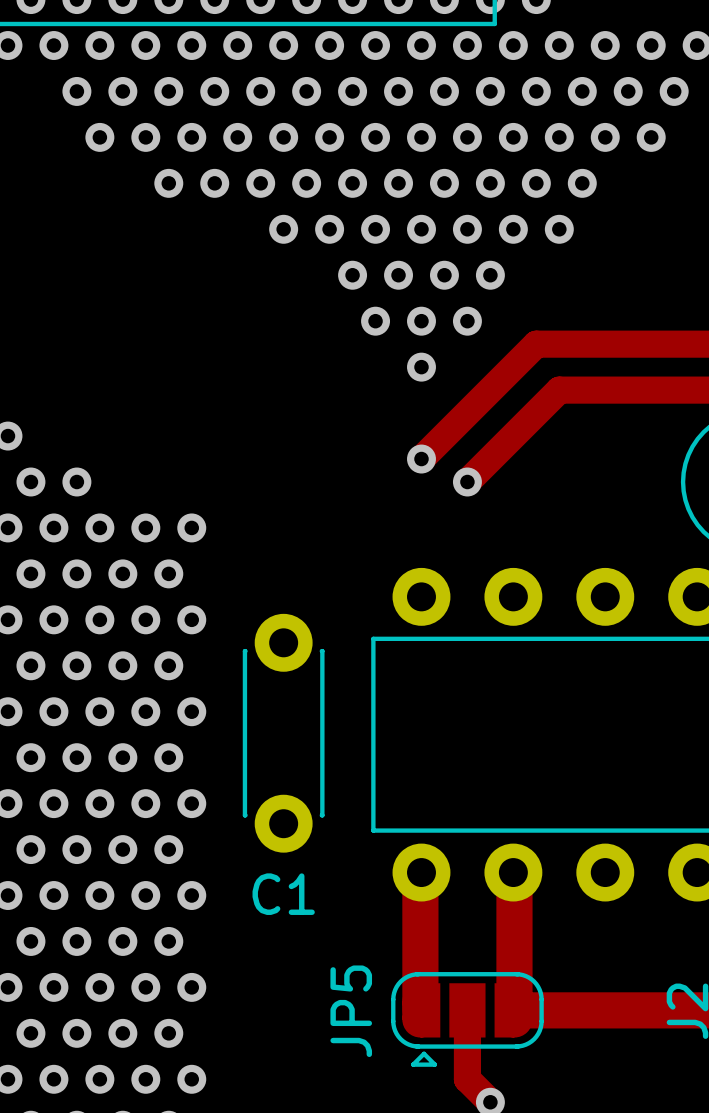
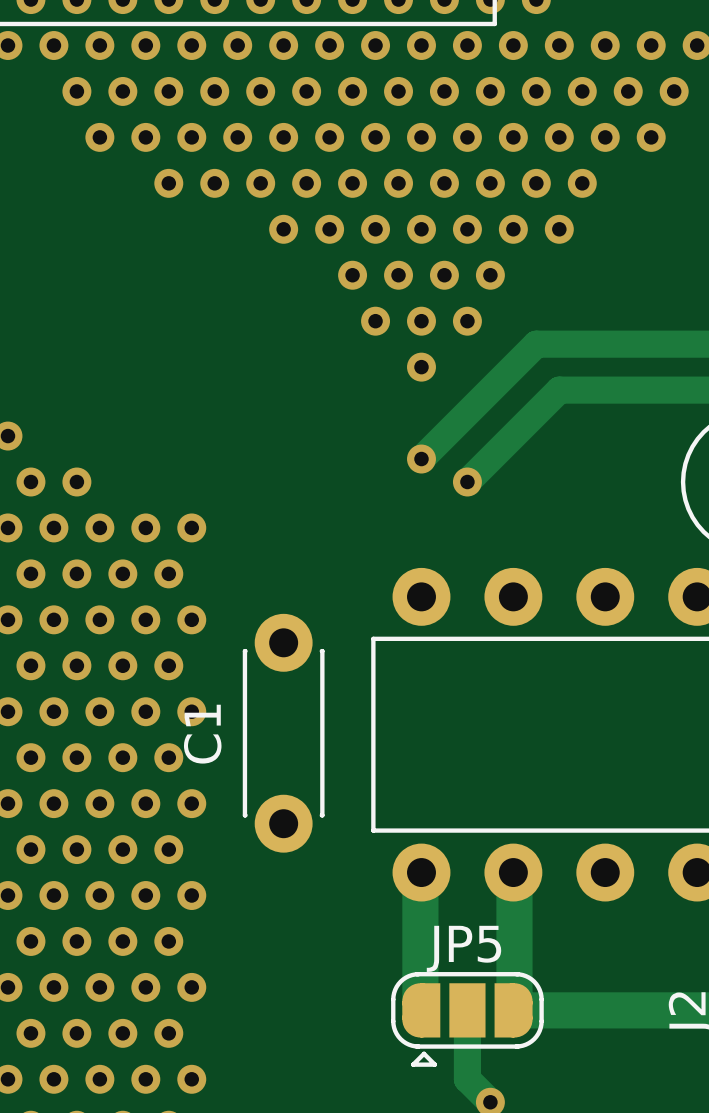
C1 name rotation: 0° (283, 894) -> 90° counterclockwise (202, 734)
C1 name position: C1 (283, 894) -> C1 (202, 734)
JP5 name rotation: 0° (351, 1011) -> 90° clockwise (463, 948)
JP5 name position: JP5 (351, 1011) -> JP5 (463, 948)

